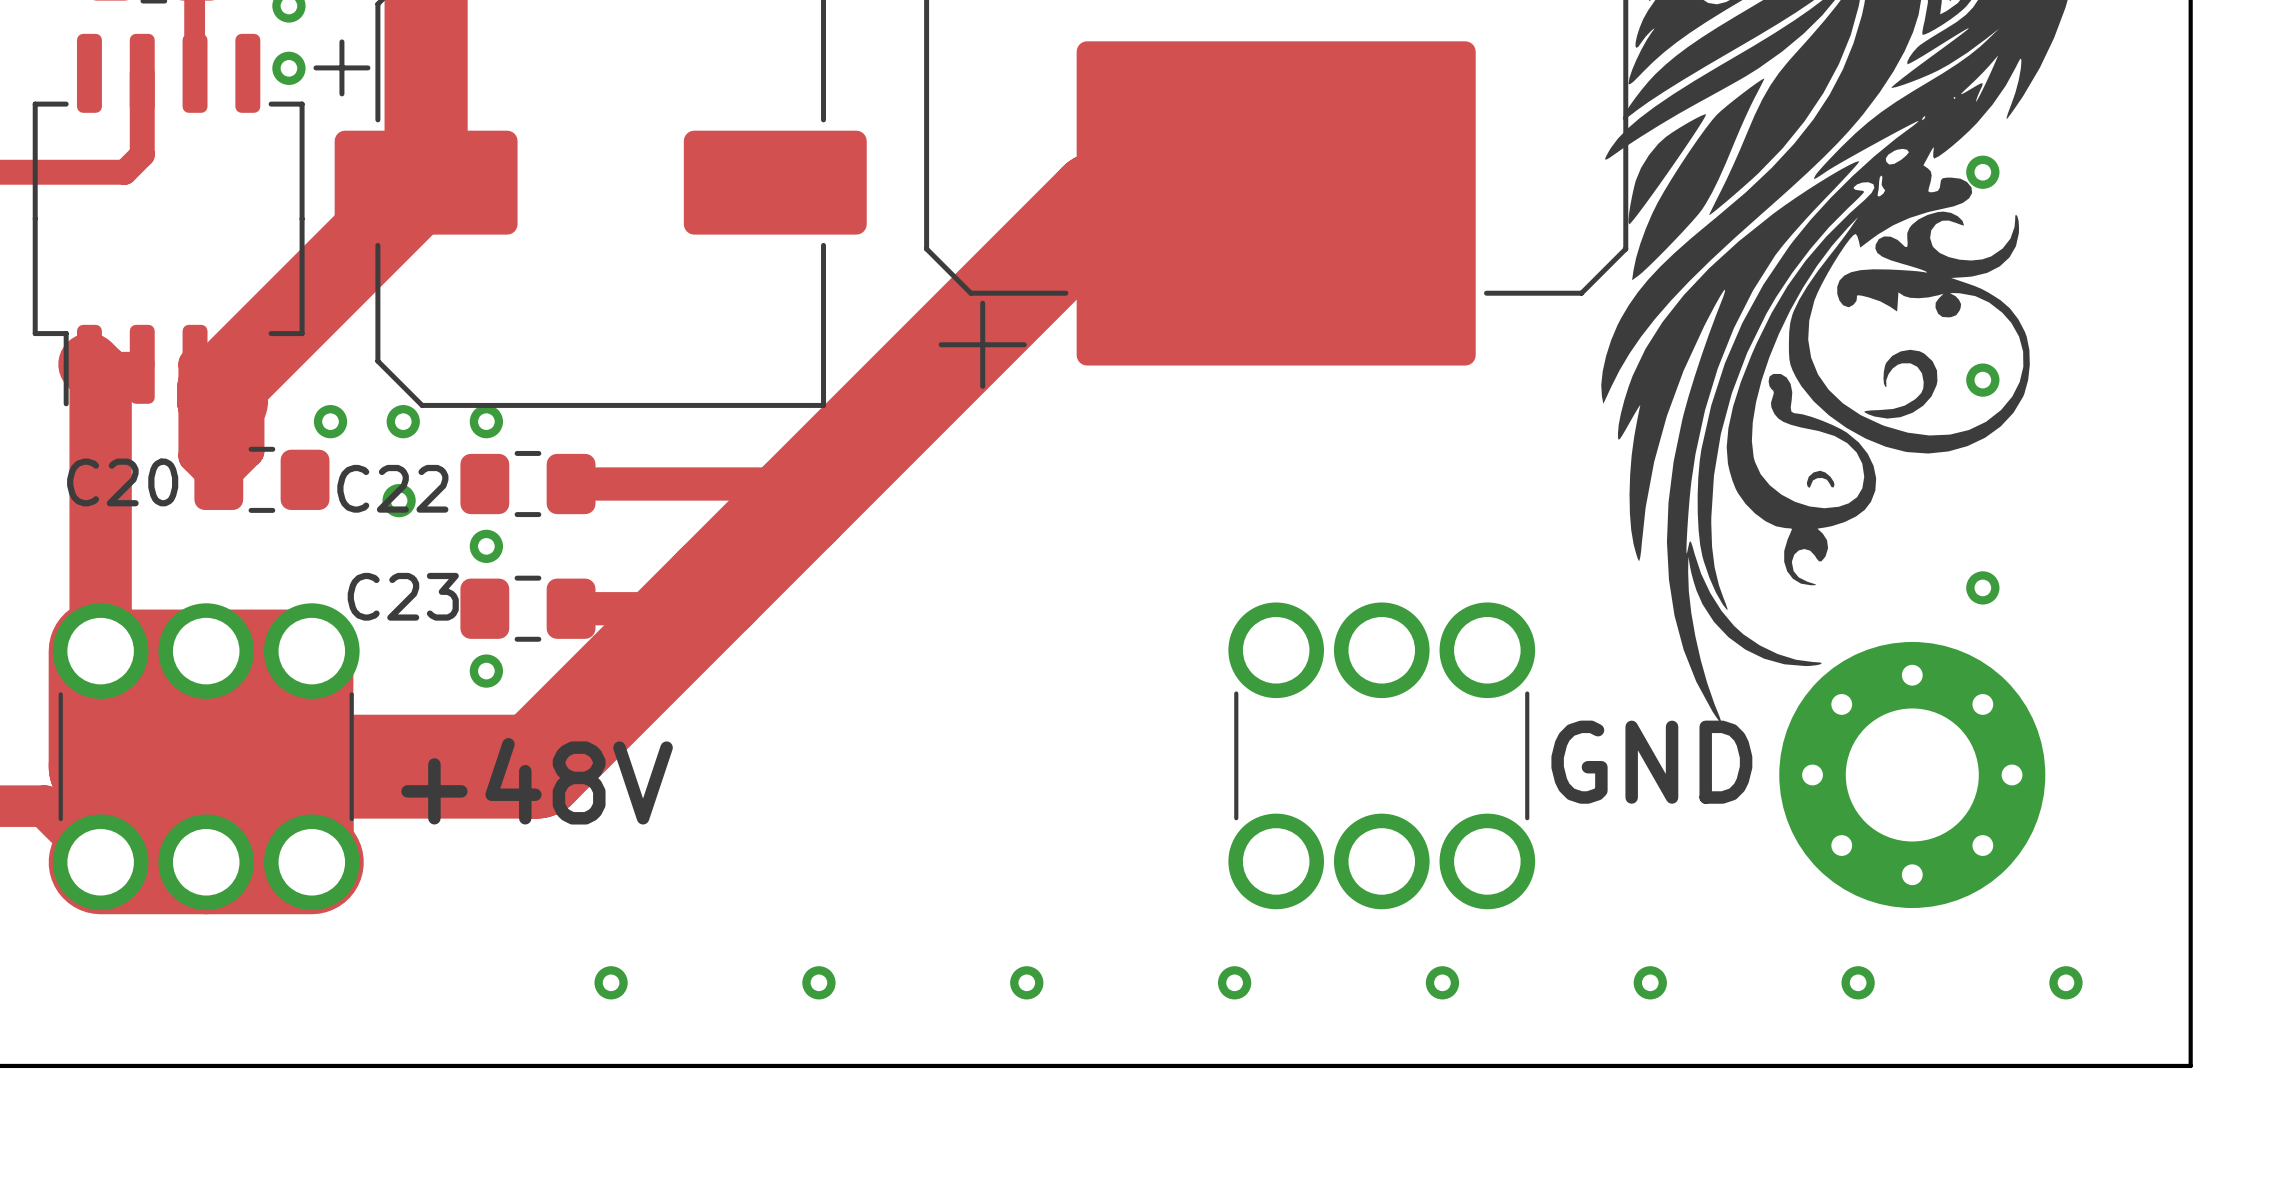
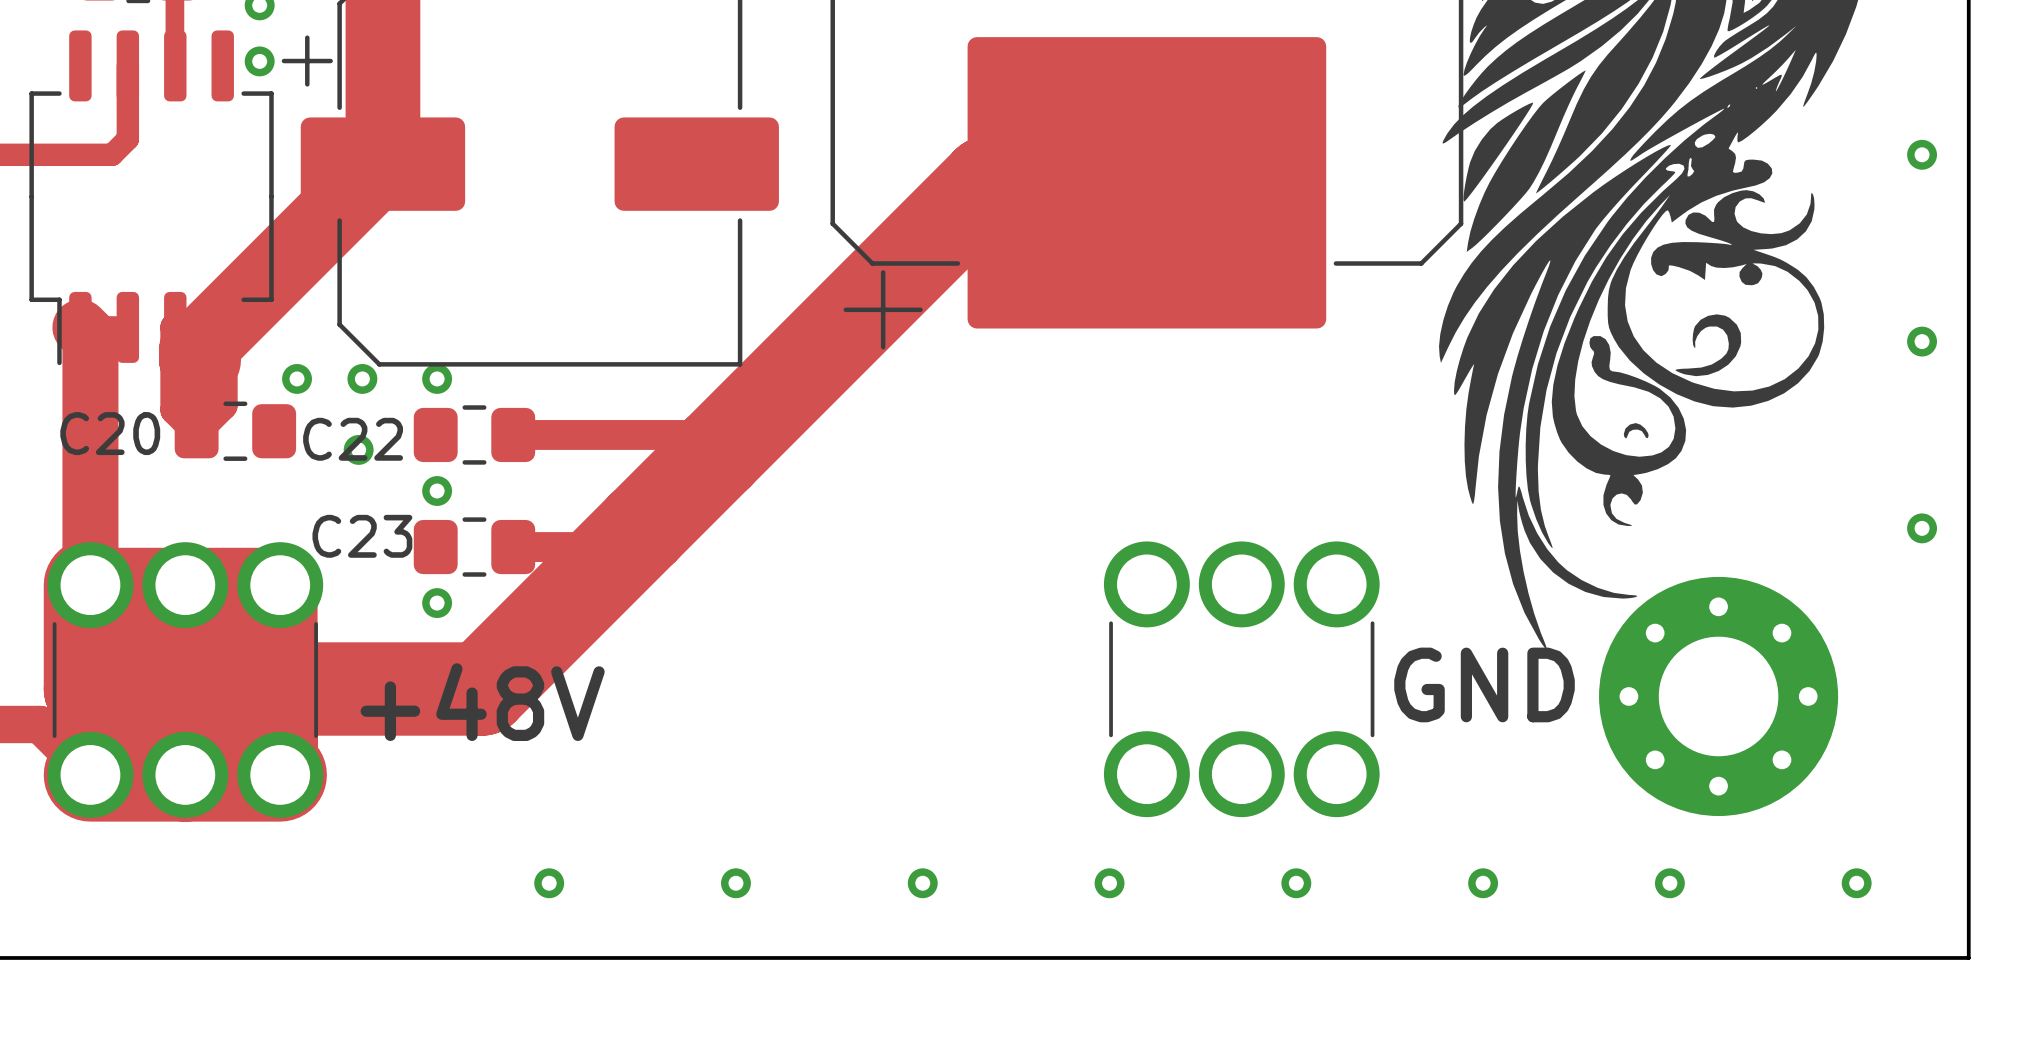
via: (1982, 172) -> none
via: none -> (1922, 154)
via: (1982, 380) -> none
via: none -> (1922, 341)
via: (1982, 587) -> none
via: none -> (1922, 528)

